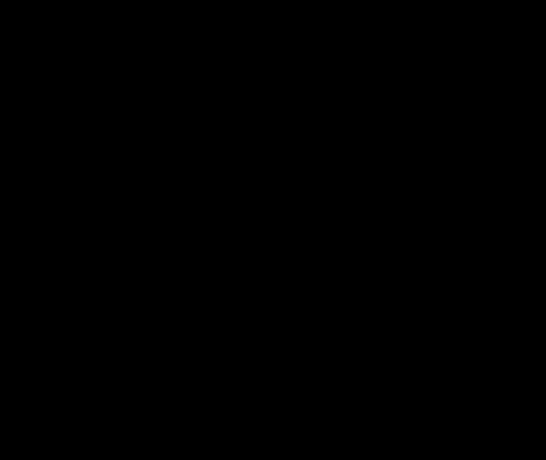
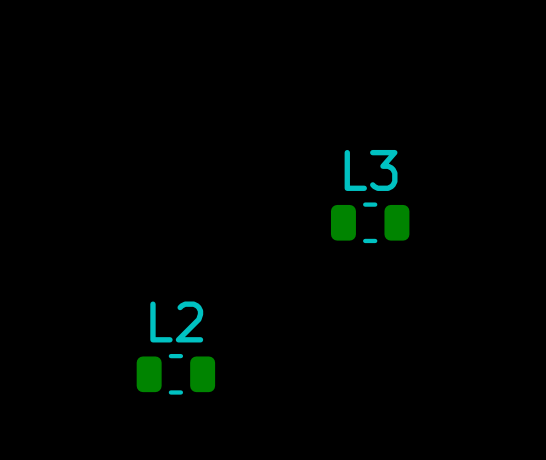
L3: none -> (370, 222)
L2: none -> (175, 374)

